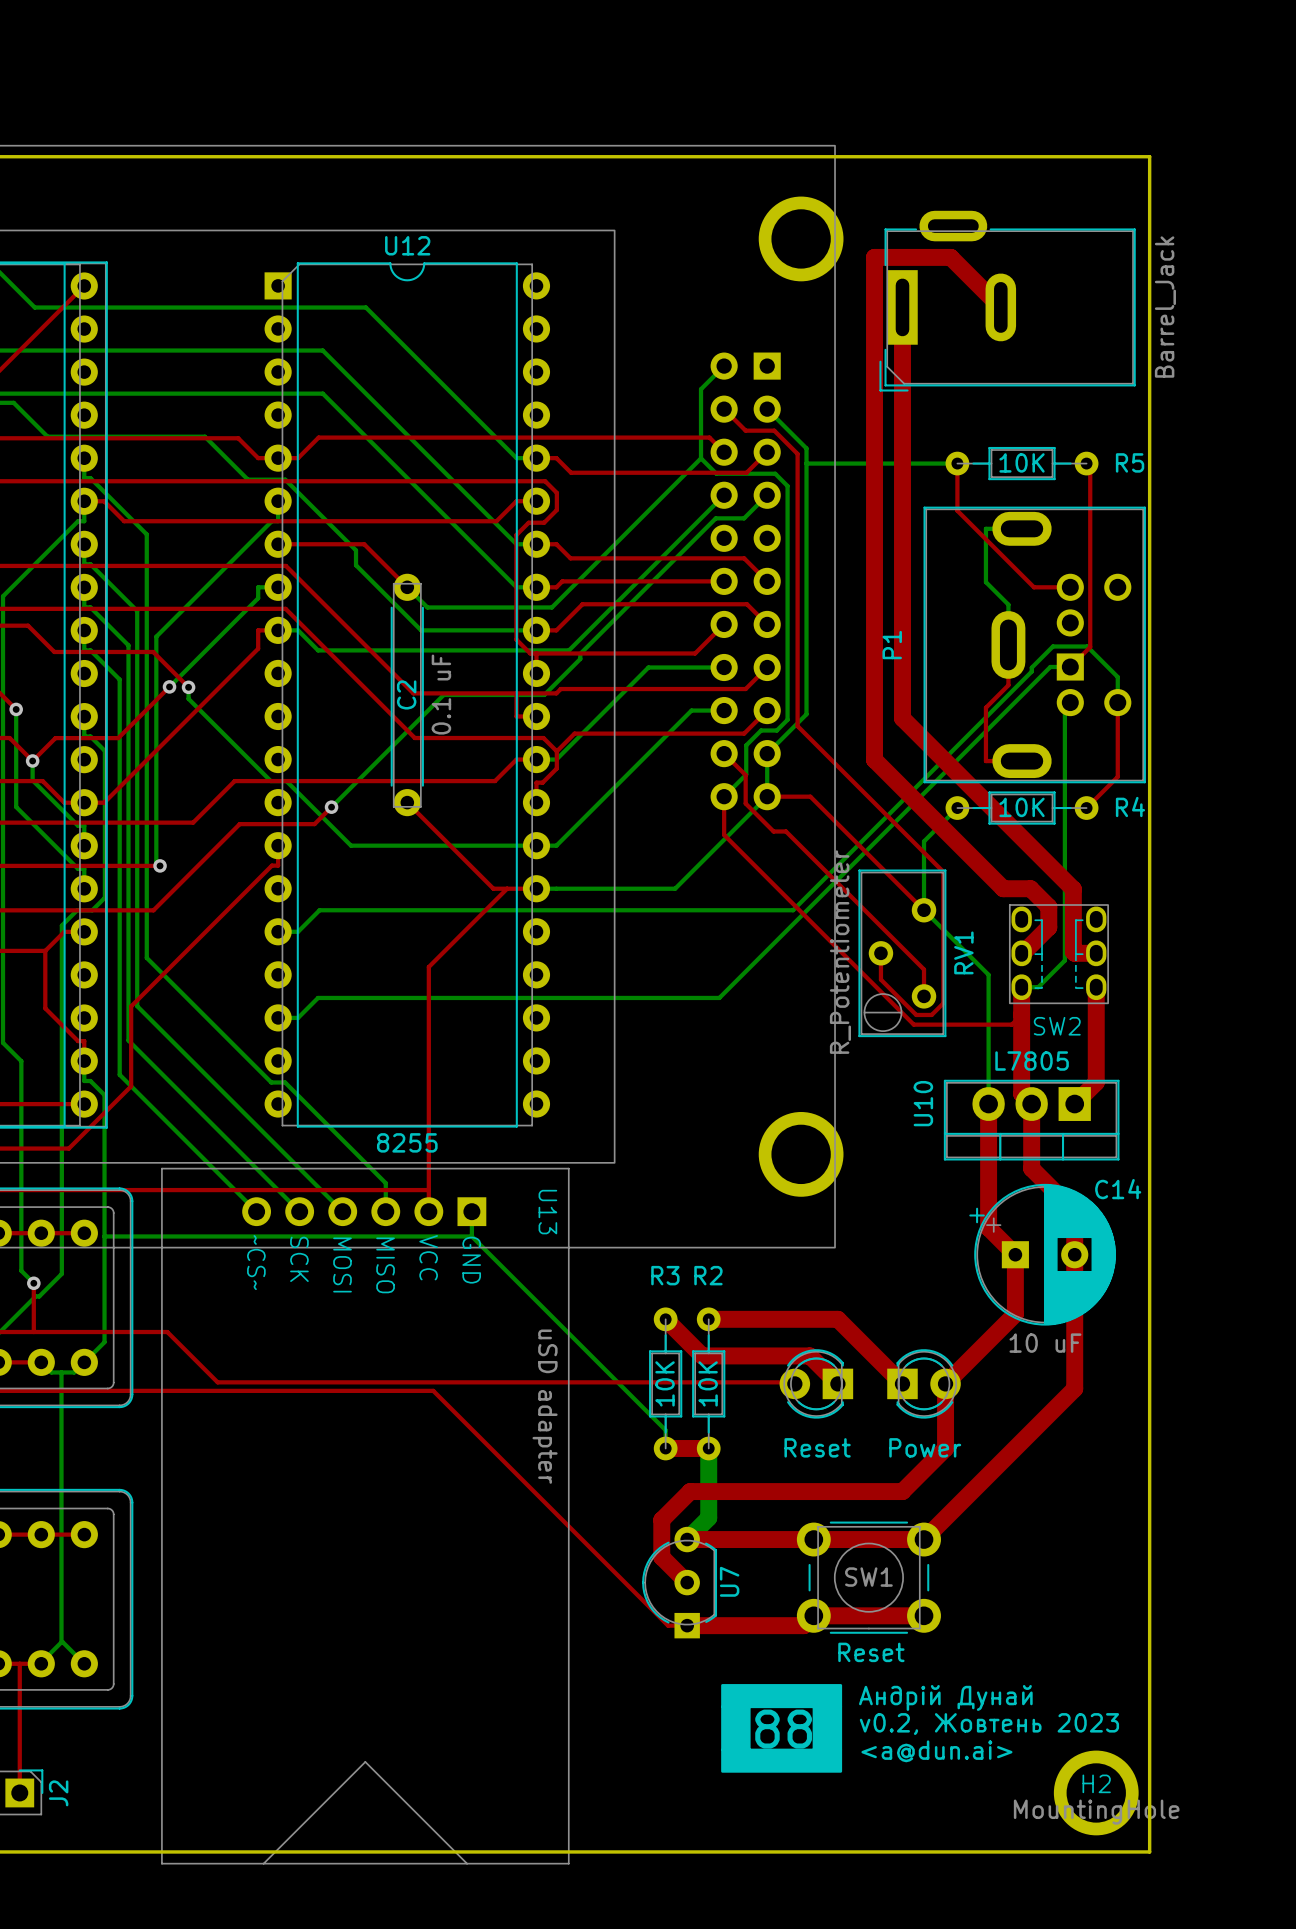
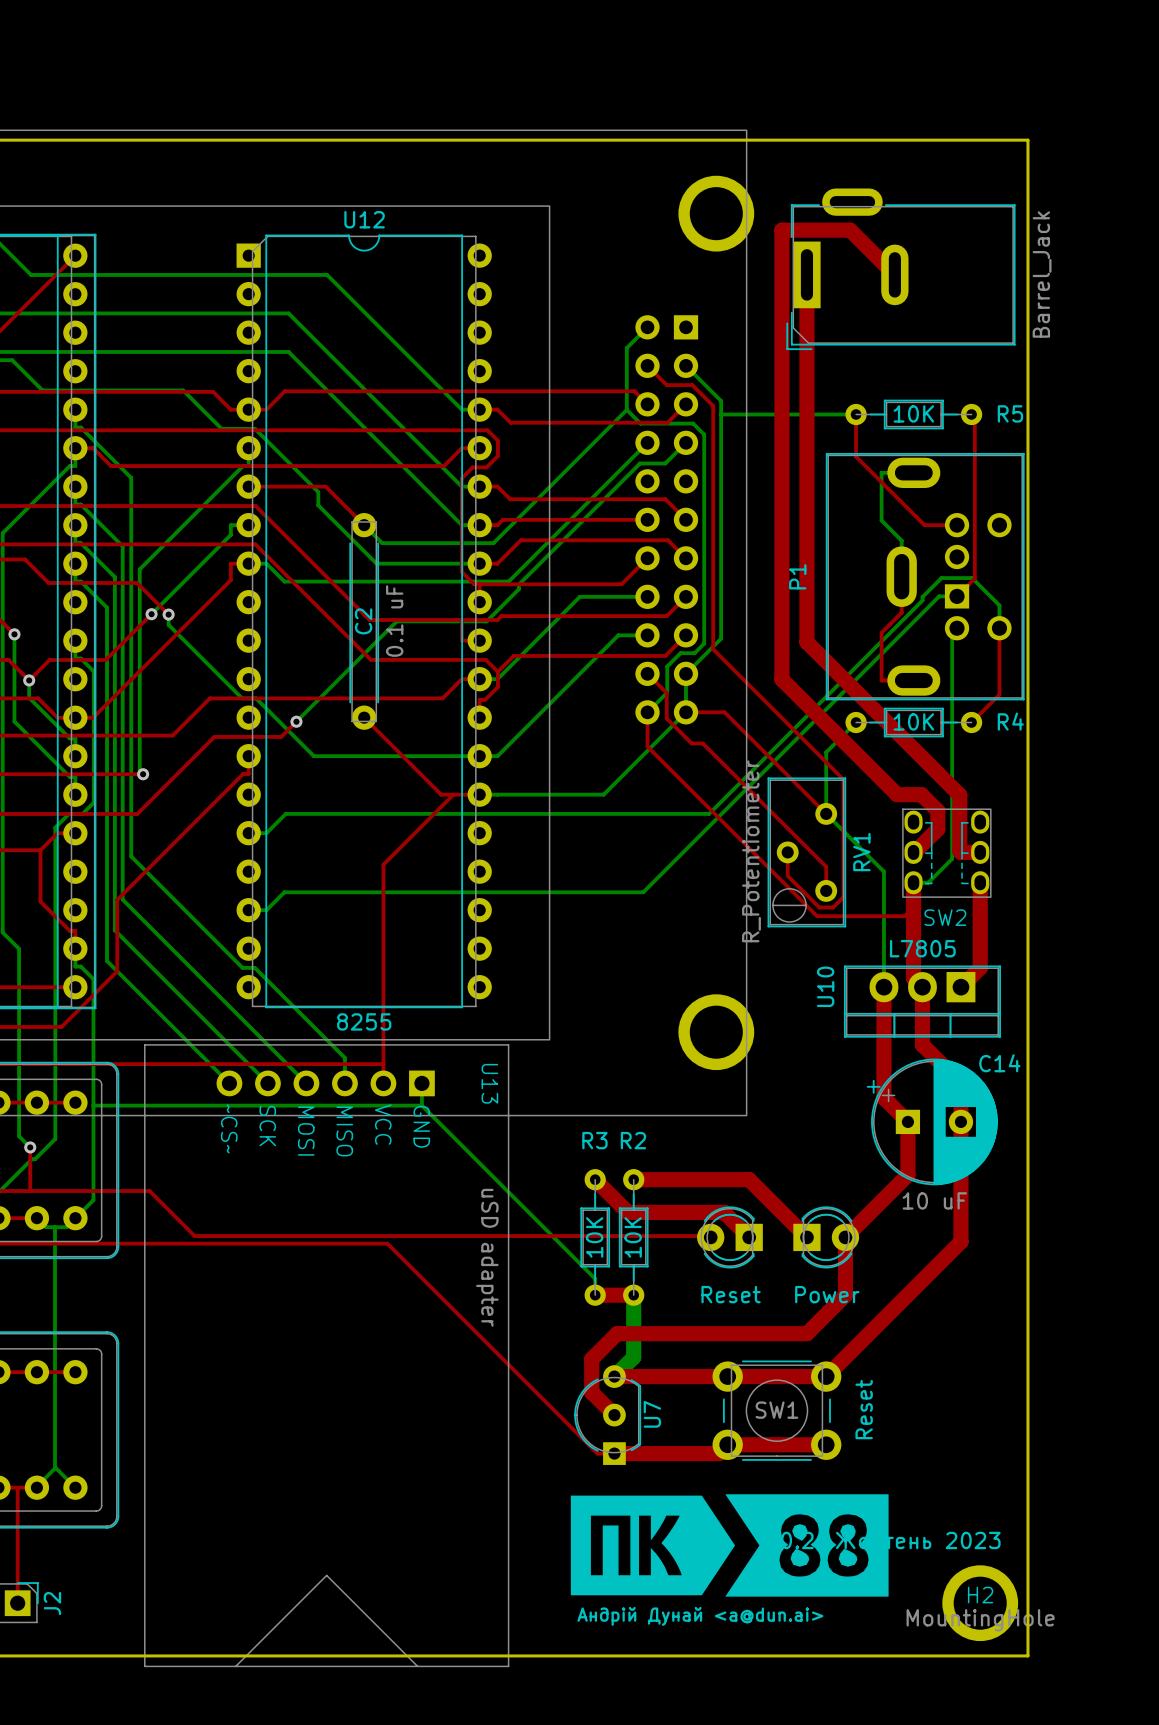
SW1 value rotation: 0° (871, 1652) -> 90° counterclockwise (864, 1409)
SW1 value position: Reset (871, 1652) -> Reset (864, 1409)
drawing: none -> [725, 1494, 889, 1597]
drawing: [721, 1684, 843, 1773] -> none
text: Андрій Дунай (945, 1697) -> none
drawing shape: [721, 1705, 751, 1752] -> [570, 1495, 736, 1596]
text: 88 (783, 1729) -> none
text: <a@dun.ai> (936, 1751) -> none
text: none -> Андрій Дунай <a@dun.ai> (700, 1616)

